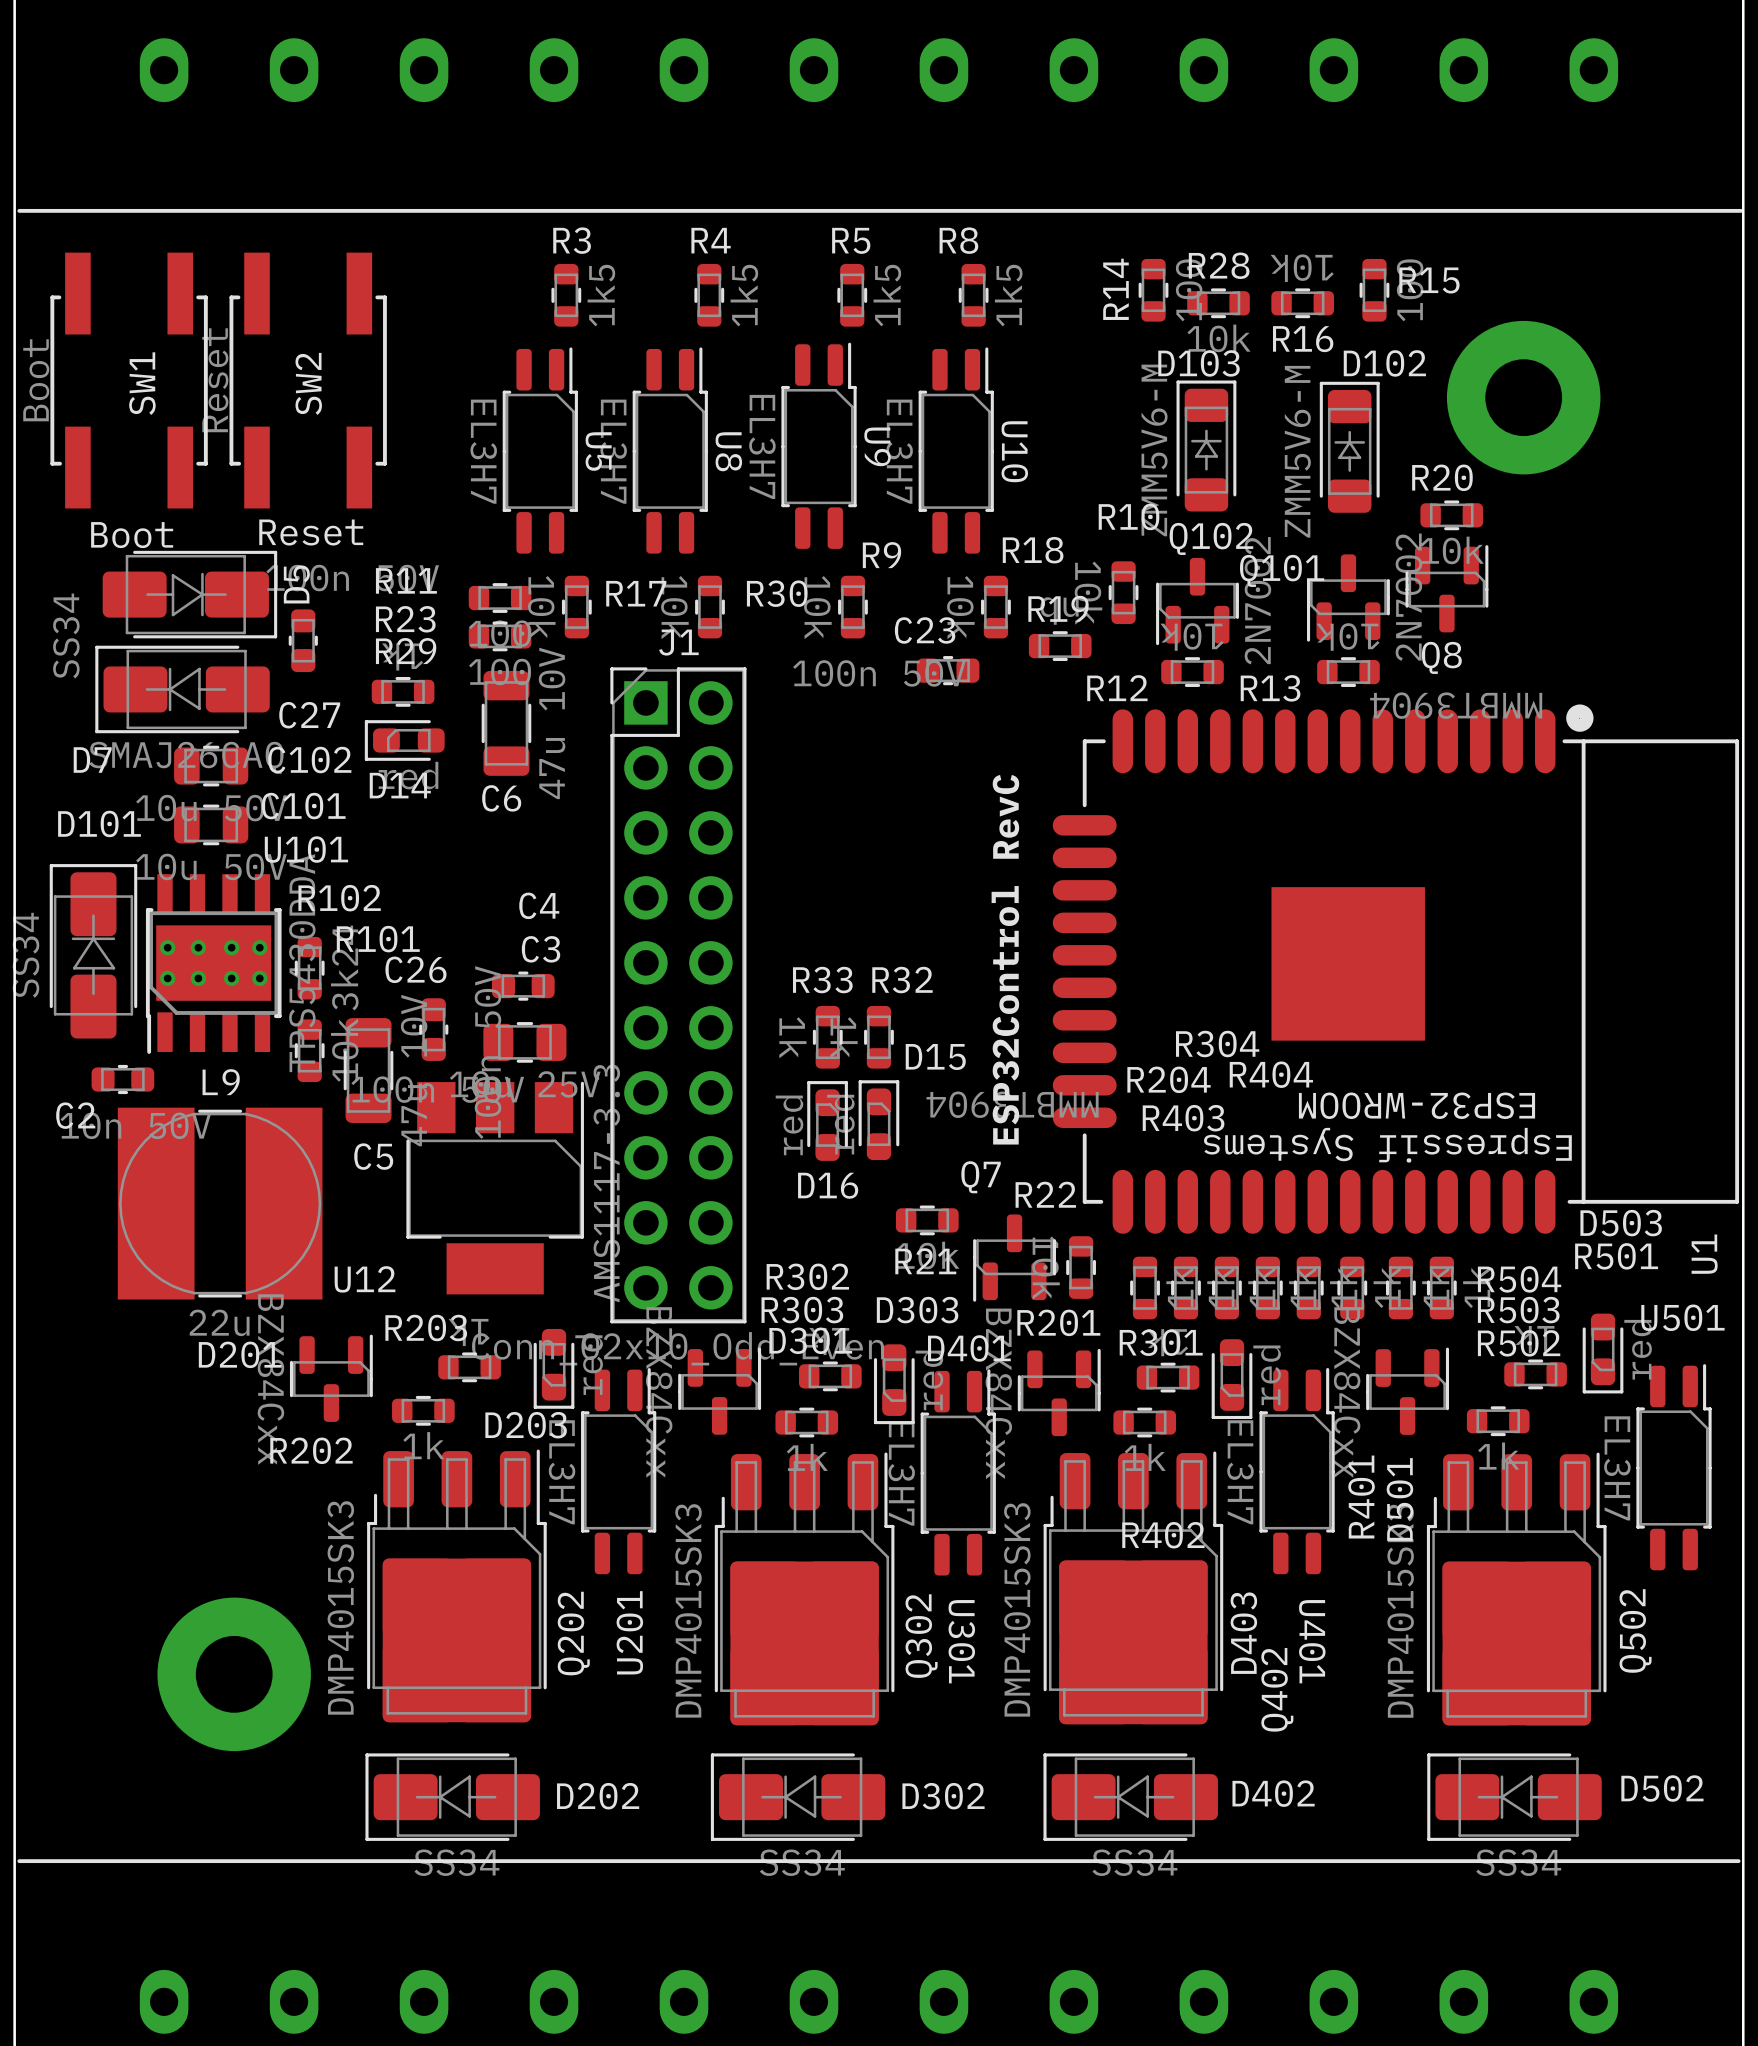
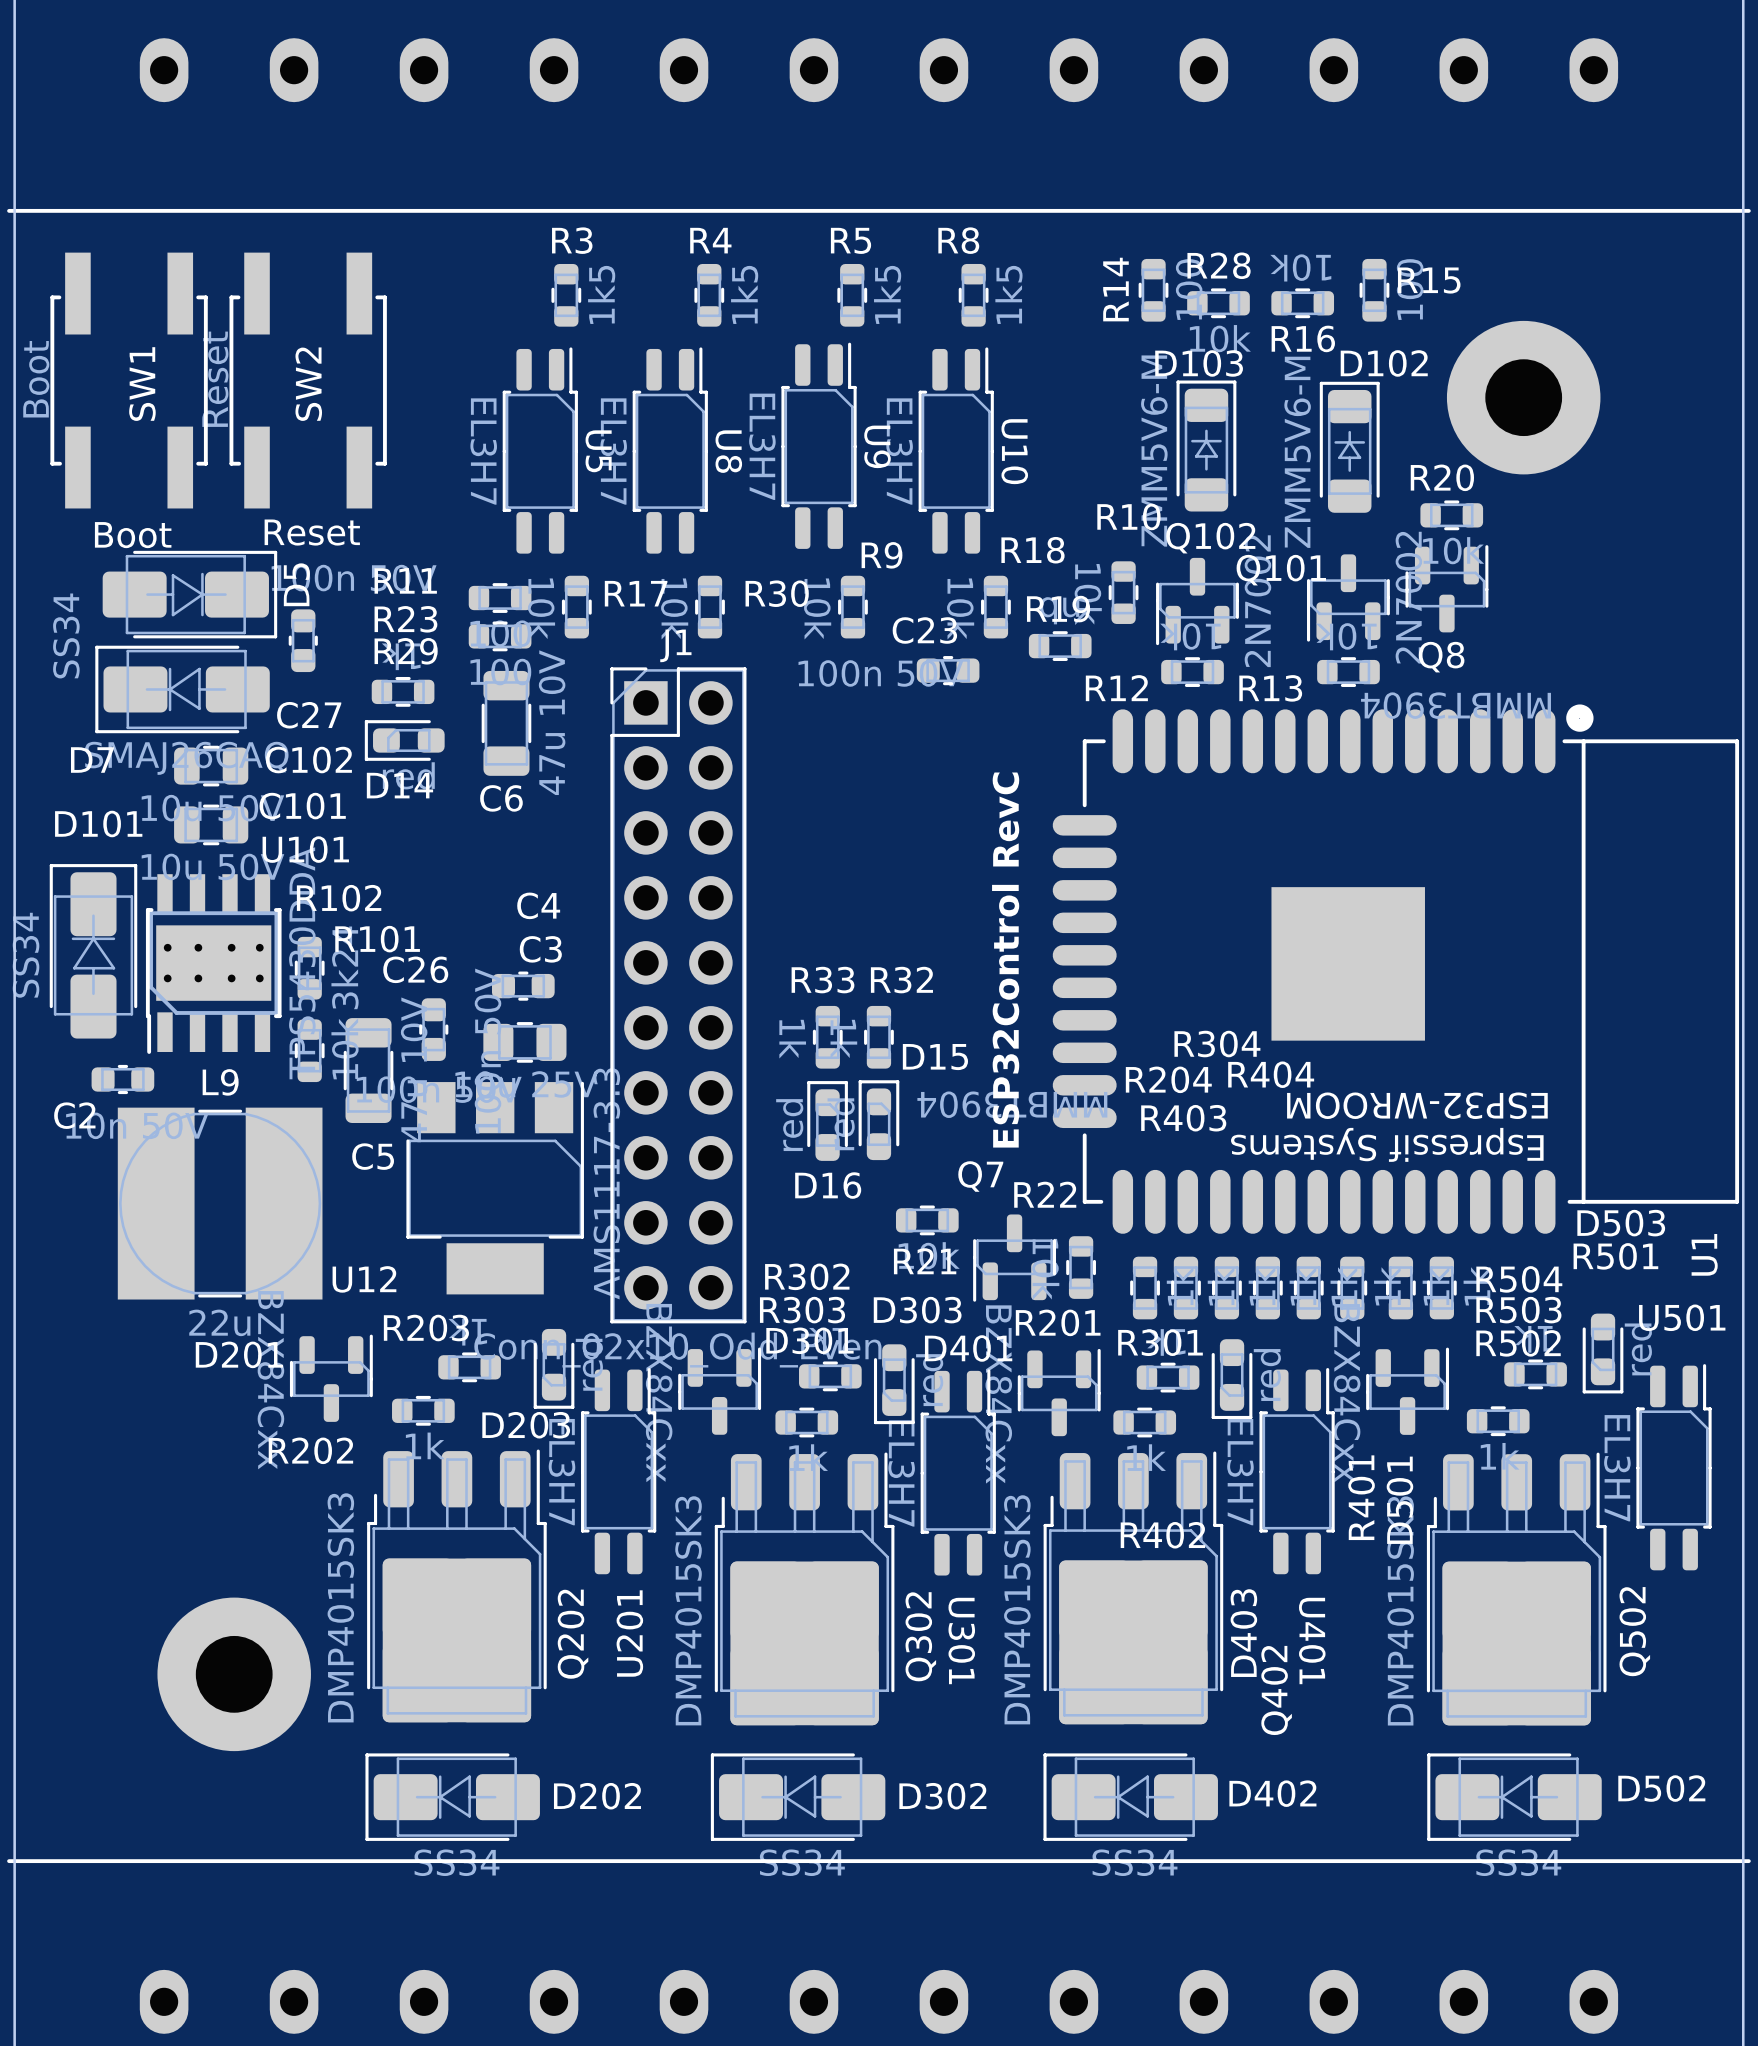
part footprint: [17, 38, 1744, 2034] -> [7, 38, 1751, 2034]

